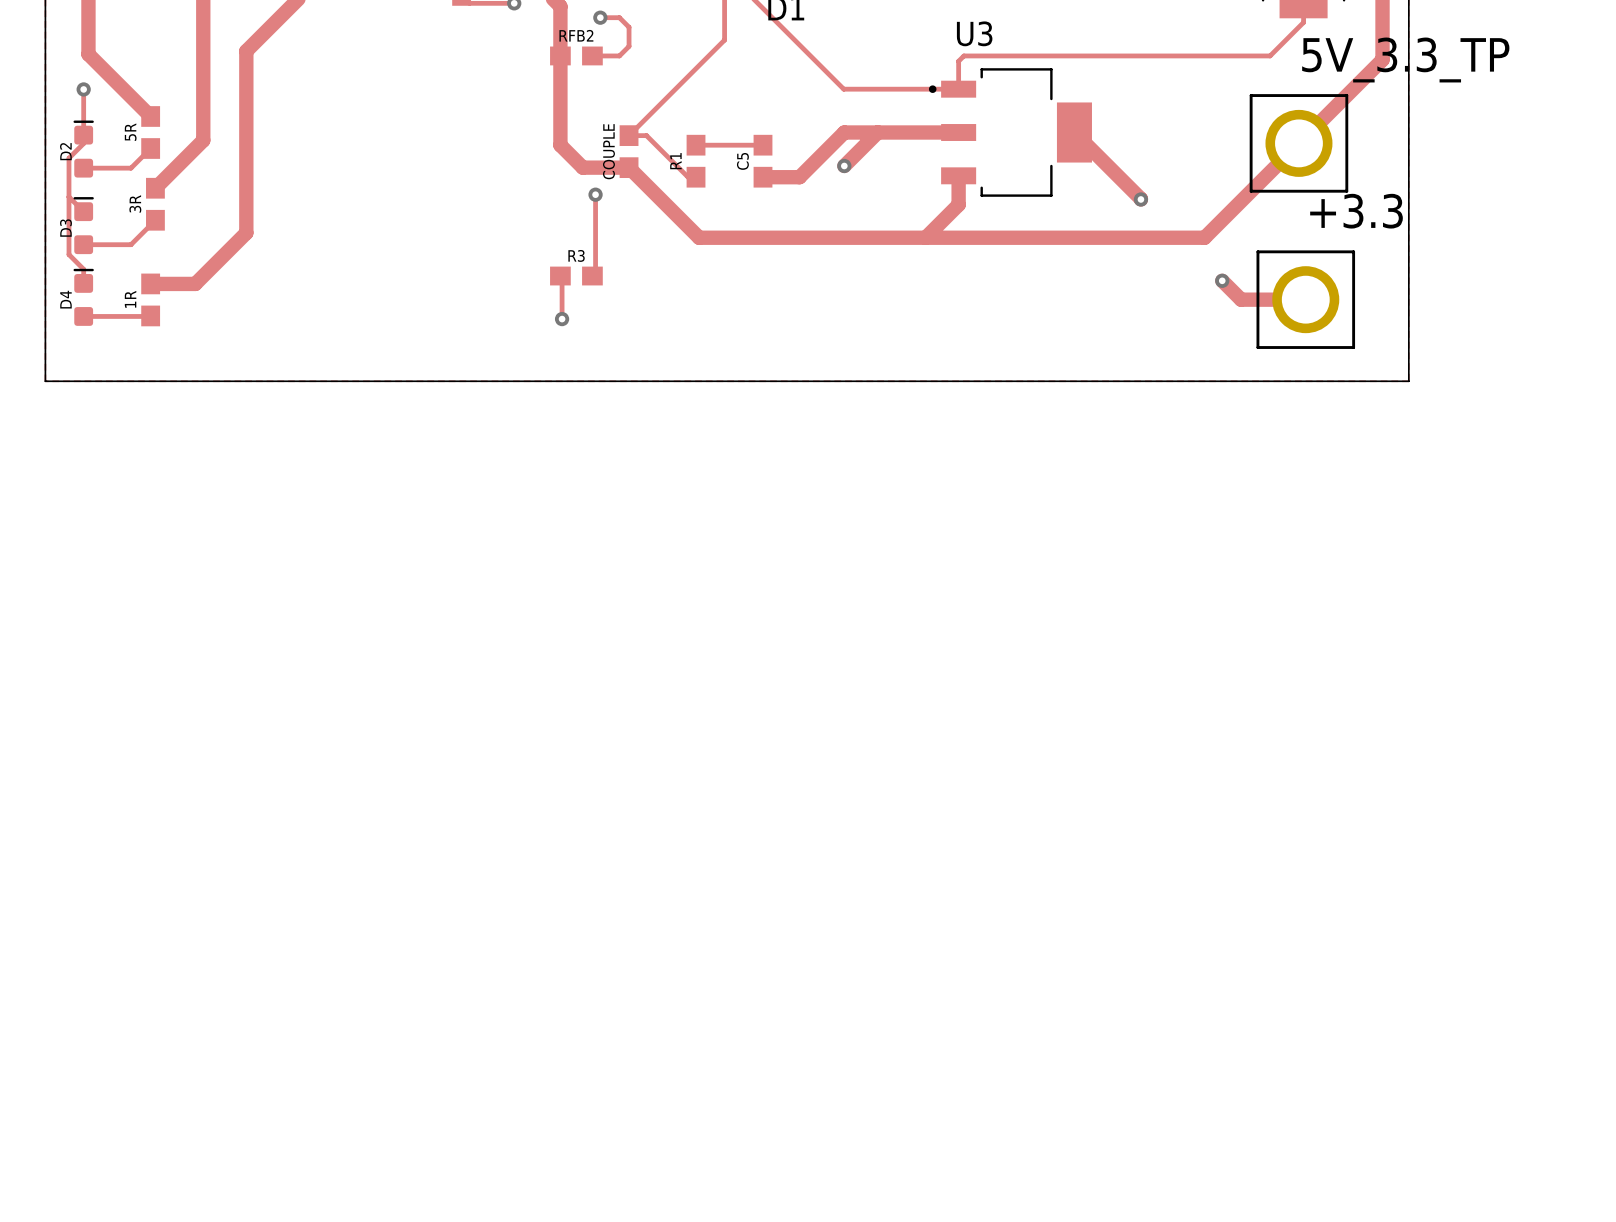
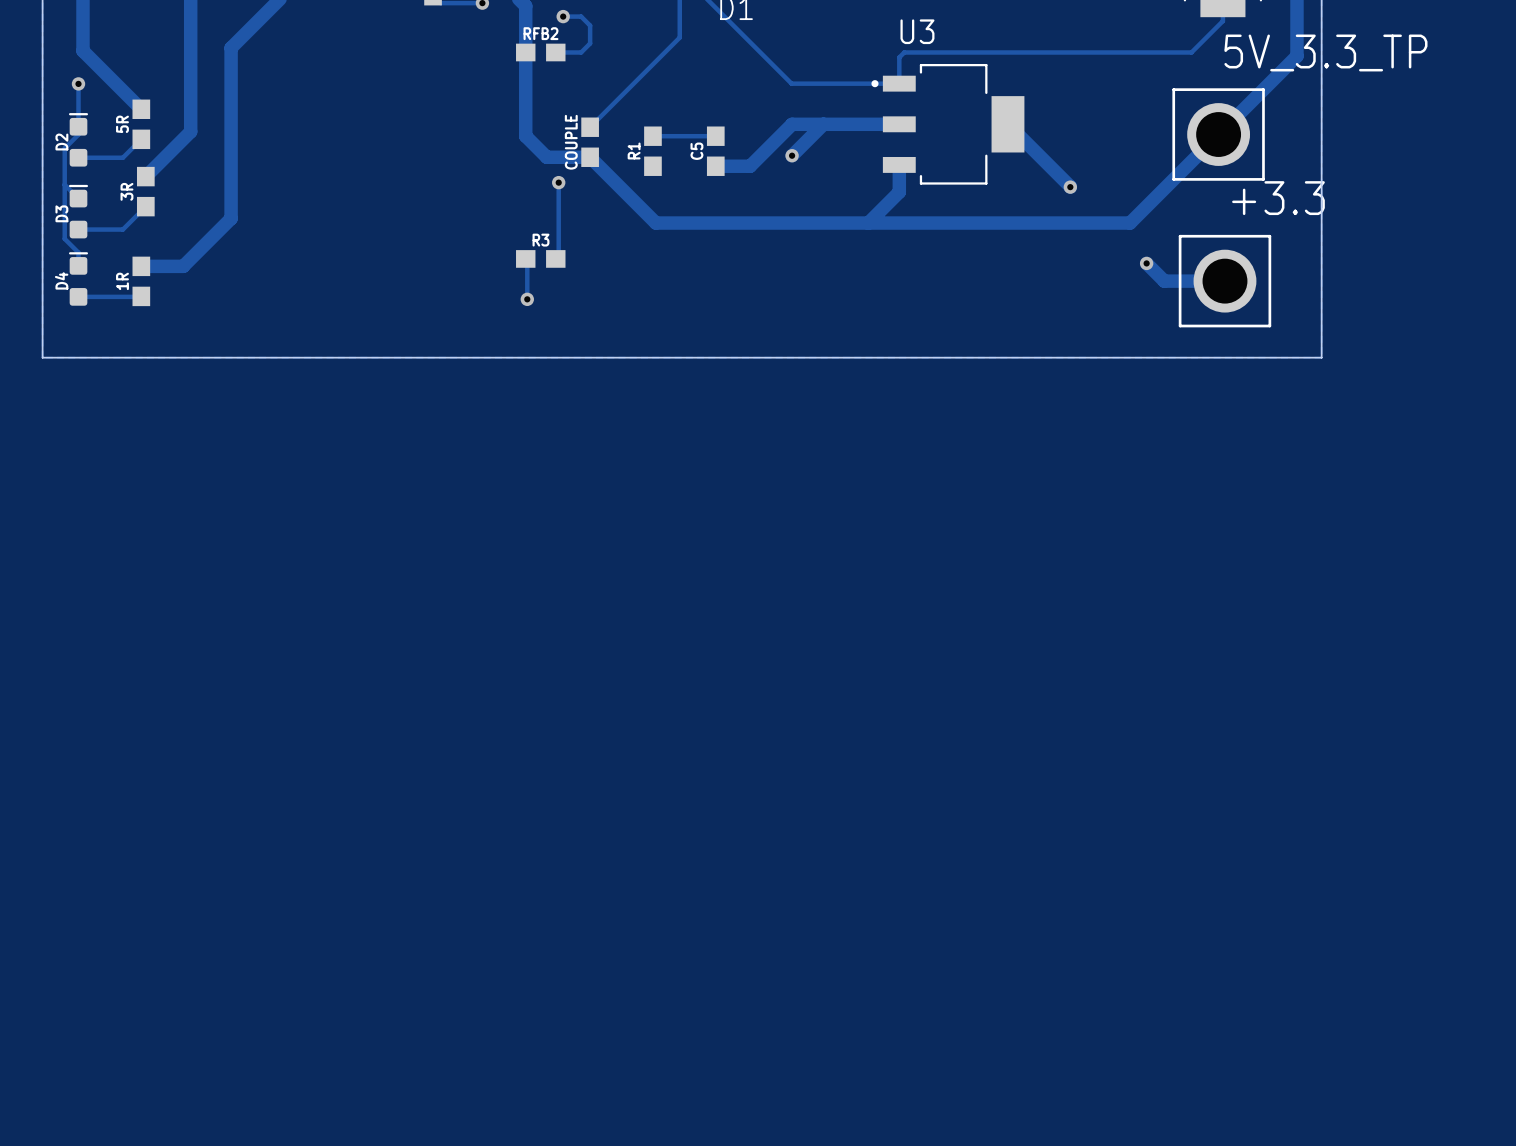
track: (629, 135) (646, 135) (688, 177) (696, 177) -> none

